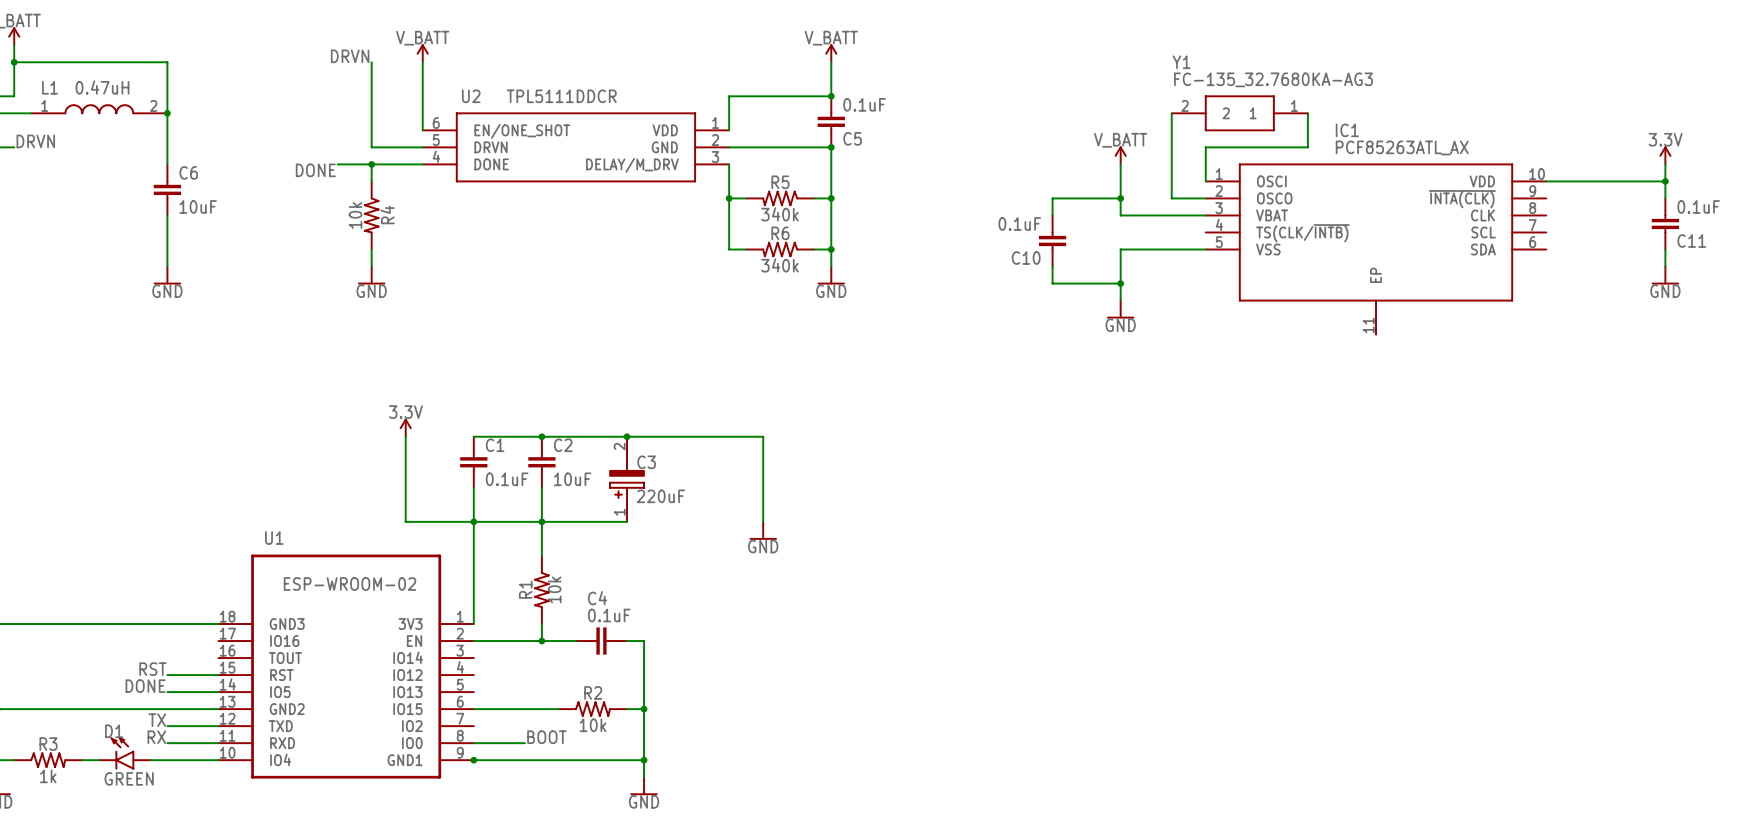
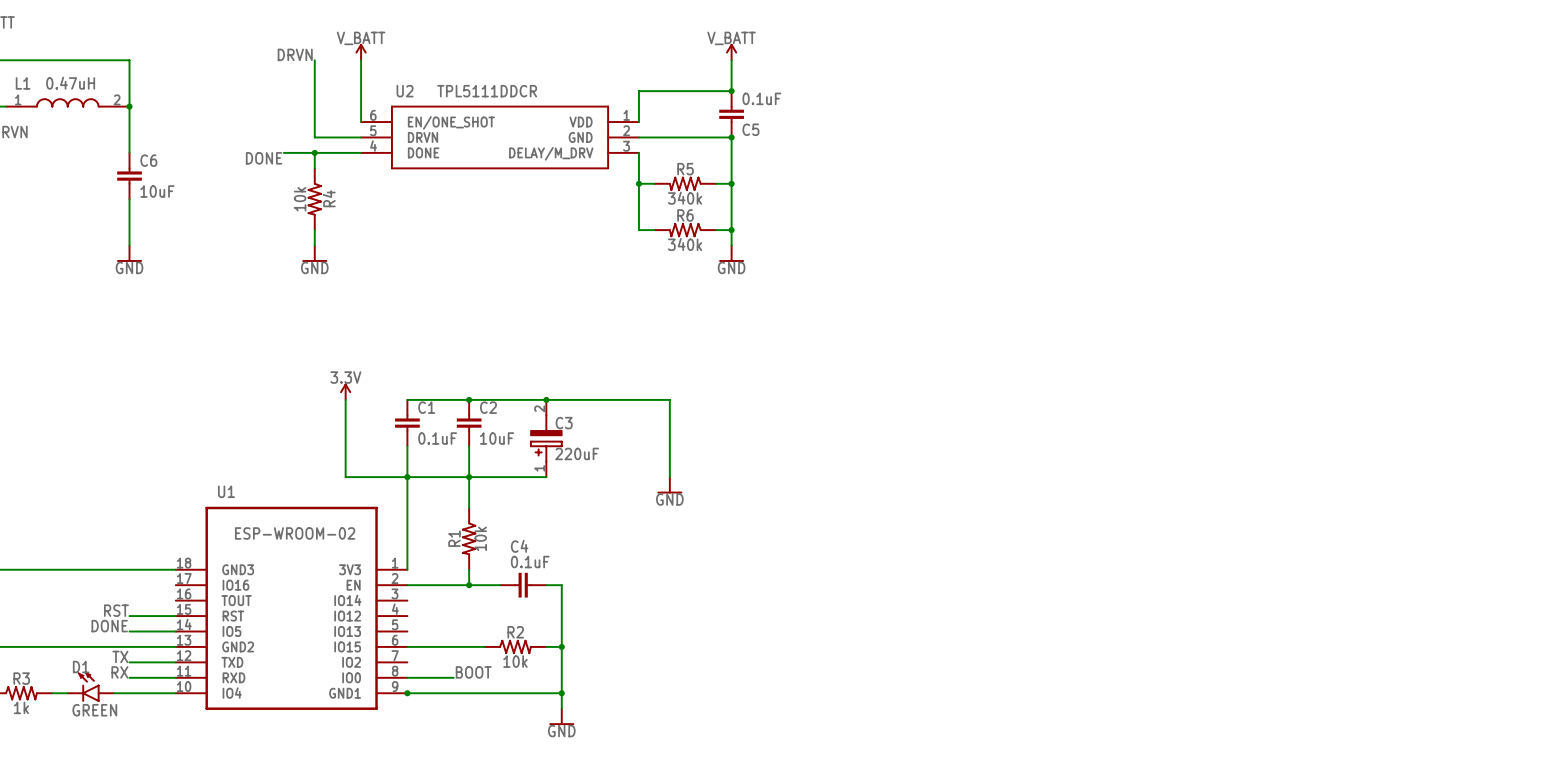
wire: (1171, 113) (1171, 198) (1205, 198) -> none
Y1: FC-135_32.7680KA-AG3 (1239, 113) -> none
wire: (1307, 113) (1307, 147) (1205, 147) (1205, 181) -> none
power symbol: V_BATT (1120, 155) -> none
power symbol: 3.3V (1665, 155) -> none
wire: (1120, 164) (1120, 215) (1205, 215) -> none
wire: (1665, 164) (1665, 198) -> none
wire: (1546, 181) (1665, 181) -> none
junction: (1665, 181) -> none
wire: (1120, 198) (1052, 198) (1052, 215) -> none
junction: (1120, 198) -> none
C11: 0.1uF (1665, 223) -> none
C10: 0.1uF (1052, 241) -> none
wire: (1205, 249) (1120, 249) (1120, 300) -> none
IC1: PCF85263ATL_AX (1376, 249) -> none
wire: (1665, 249) (1665, 266) -> none
wire: (1052, 266) (1052, 283) (1120, 283) -> none
power symbol: GND (1665, 275) -> none
junction: (1120, 283) -> none
power symbol: GND (1120, 309) -> none

